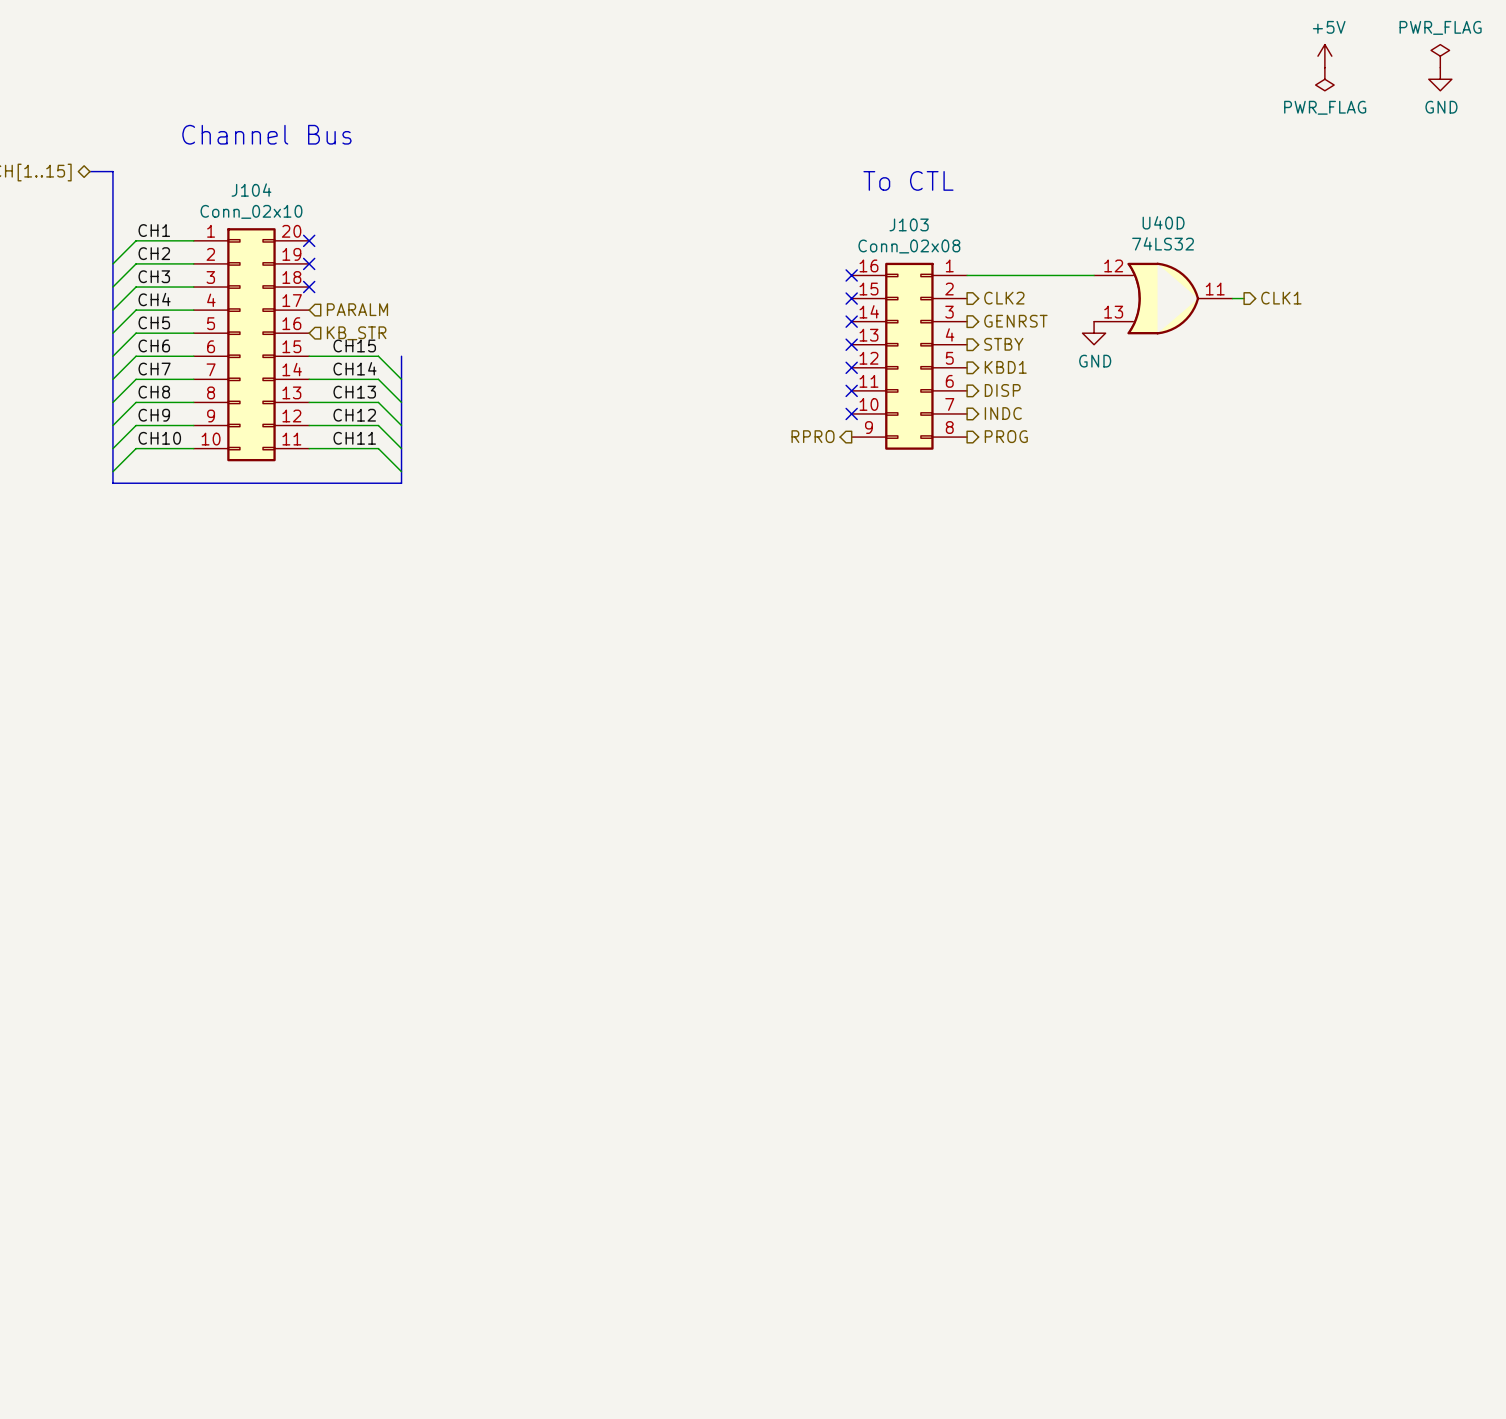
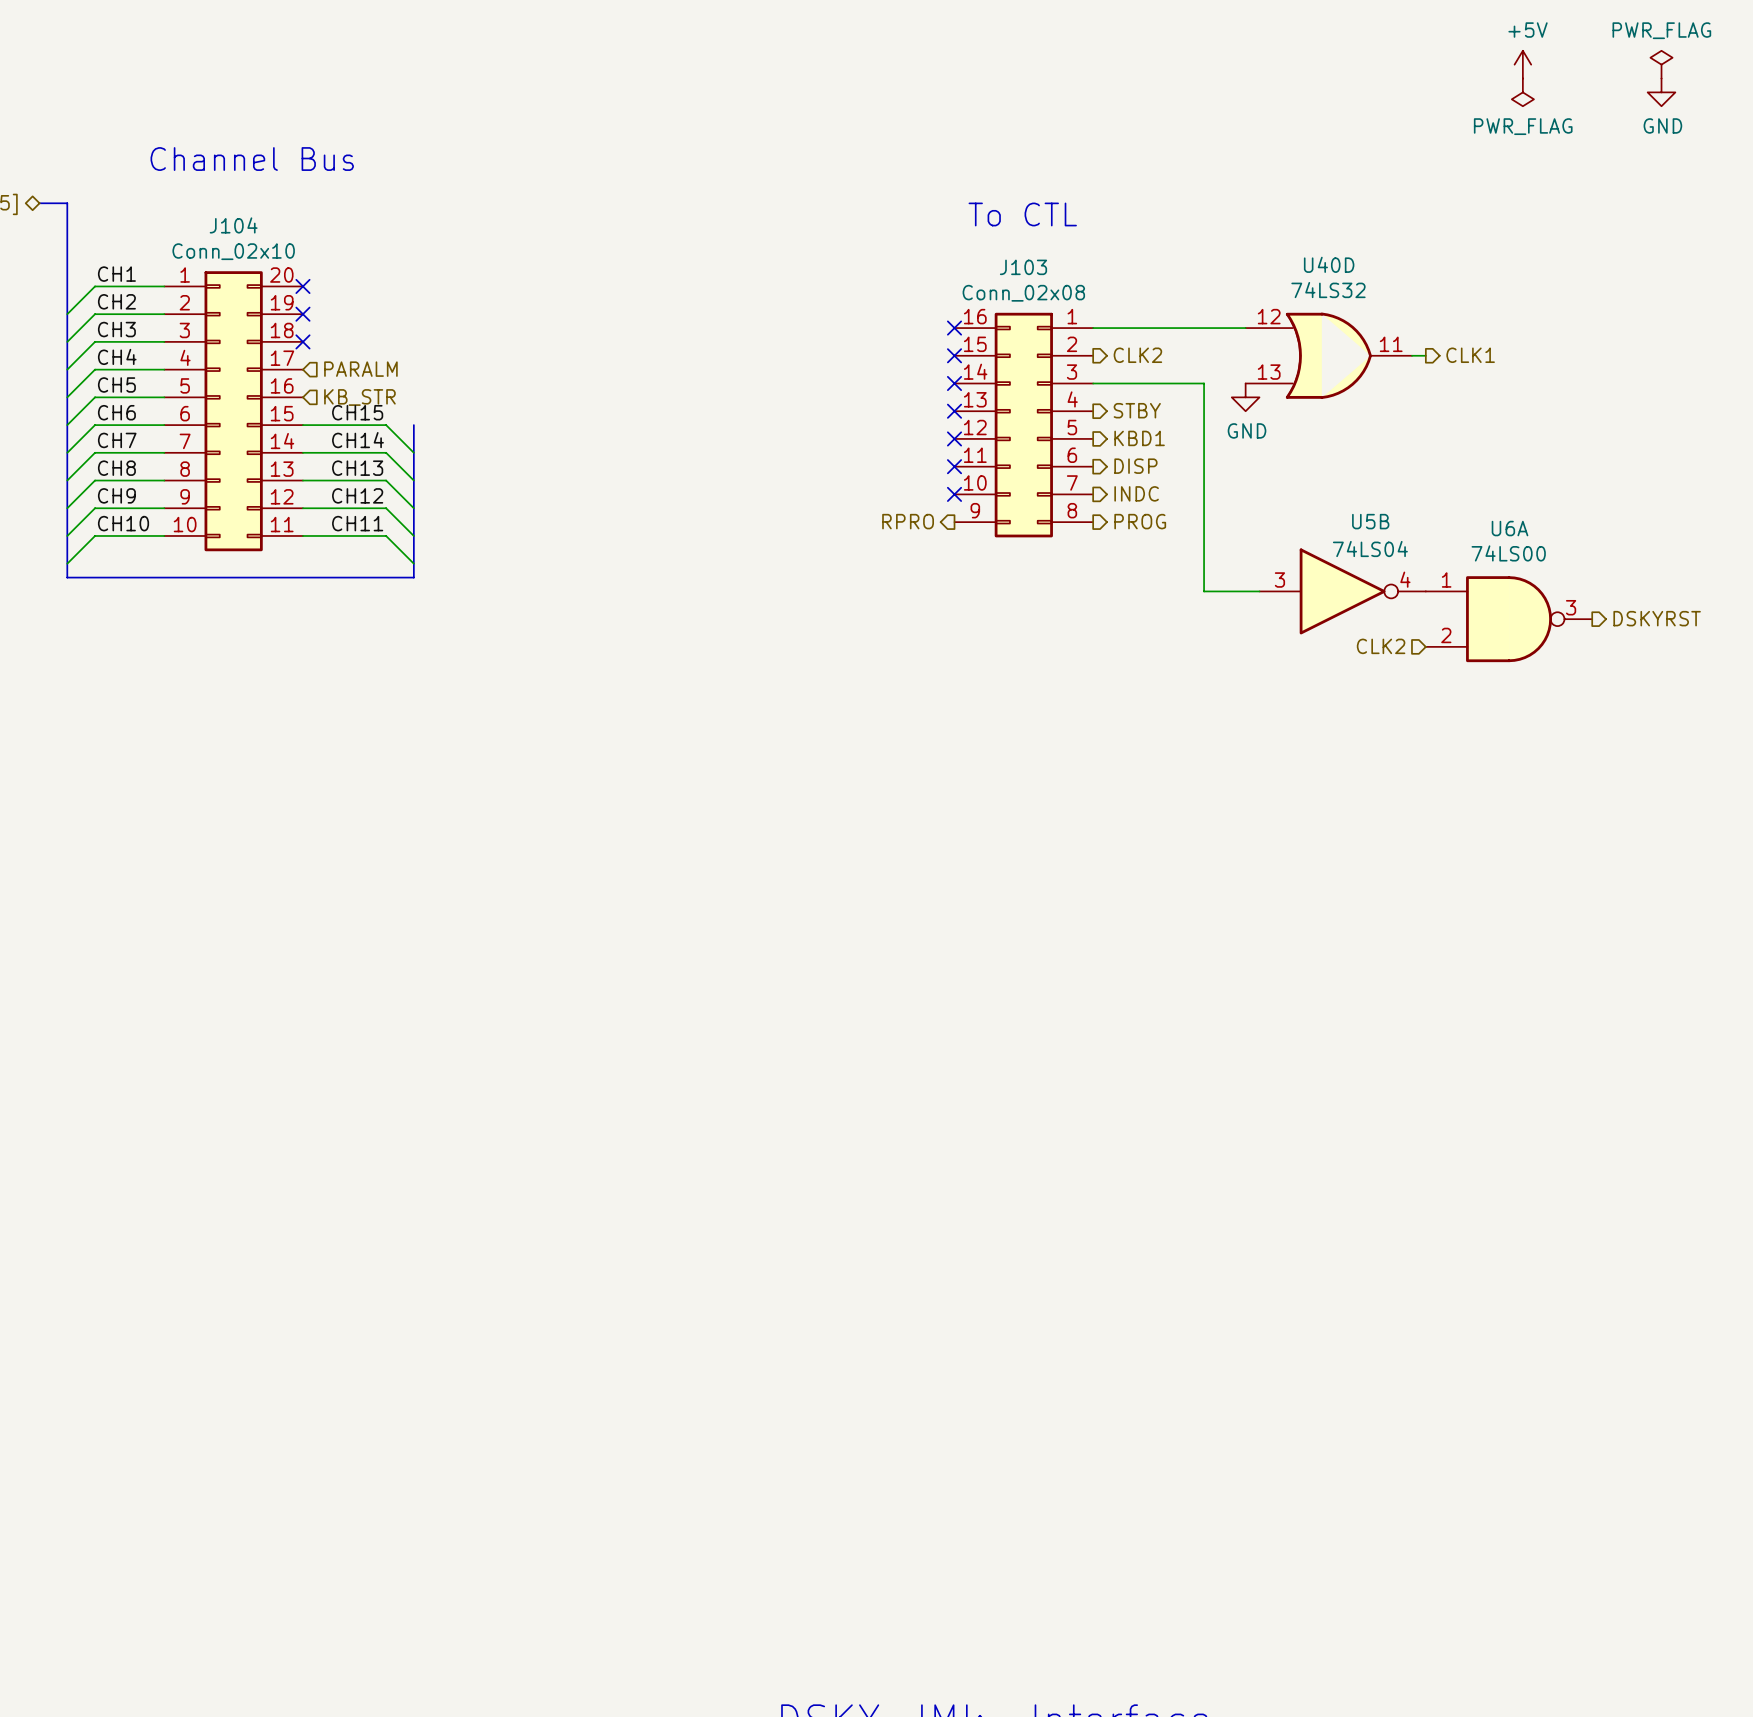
wire: none -> (1093, 383) (1204, 383) (1204, 591) (1259, 591)
hierarchical label: GENRST (1015, 321) -> none
U5B: none -> 74LS04 (1342, 591)
U6A: none -> 74LS00 (1509, 619)
hierarchical label: none -> DSKYRST (1657, 618)
hierarchical label: none -> CLK2 (1381, 646)

